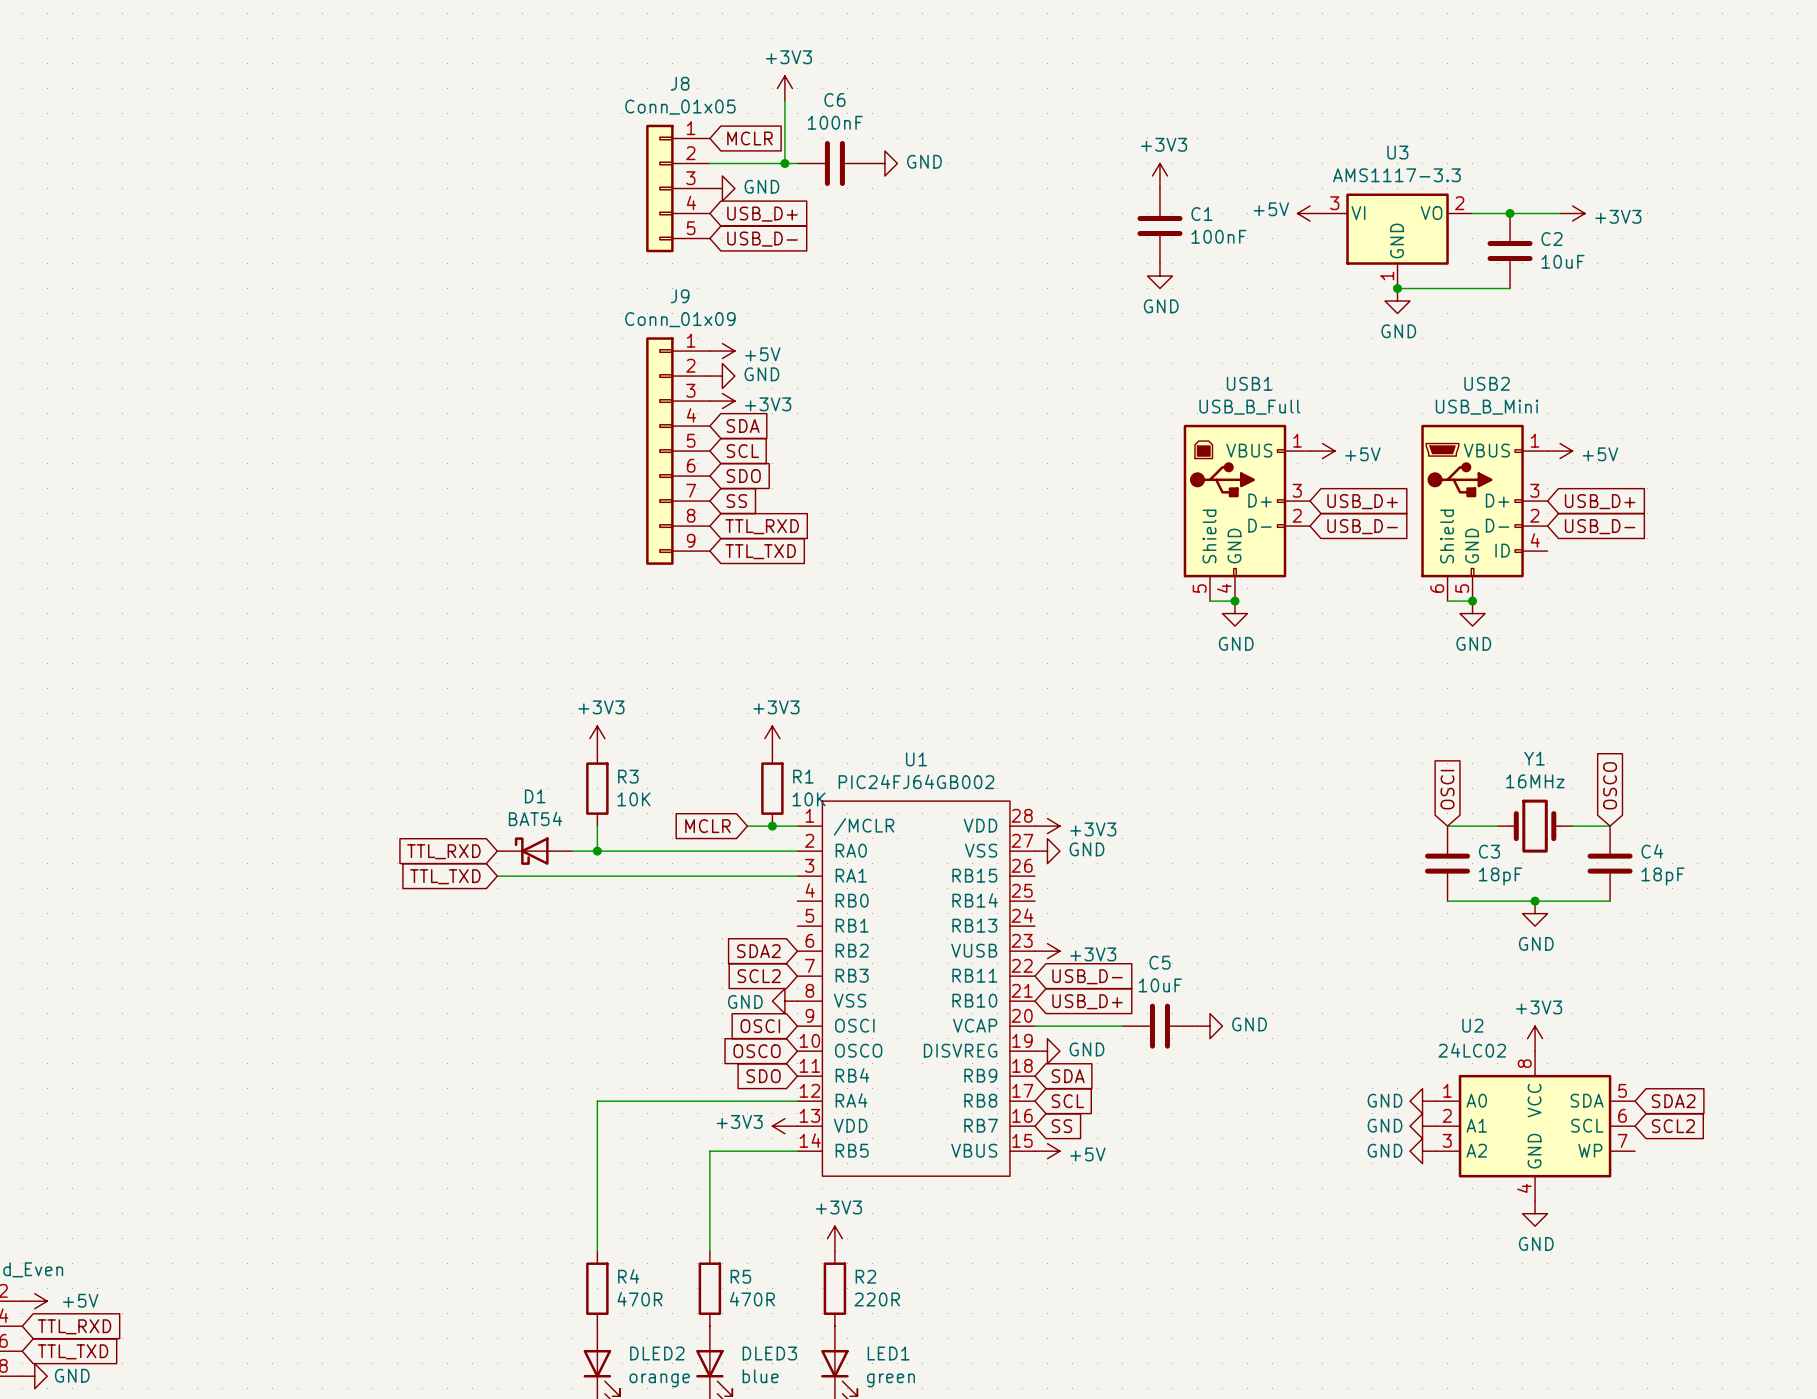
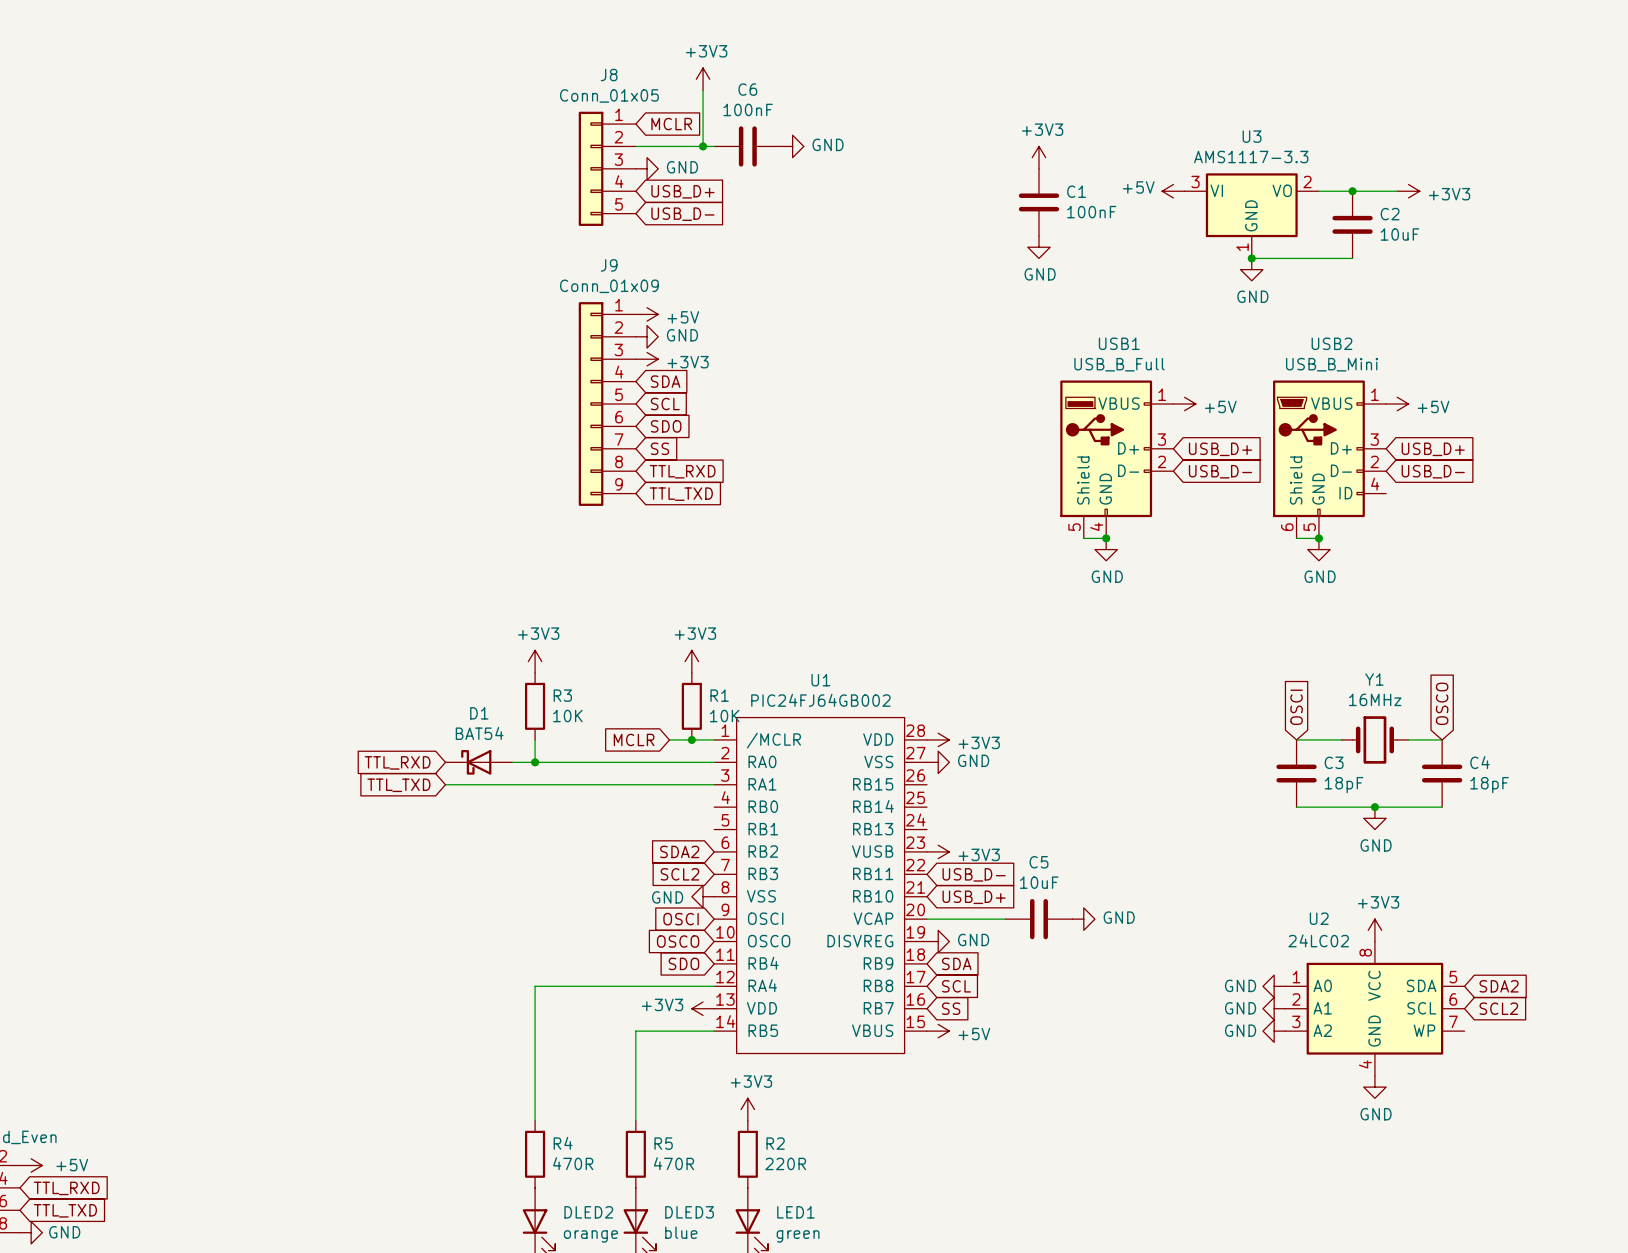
USB1 symbol: [1183, 424, 1311, 602] -> [1060, 380, 1174, 539]

